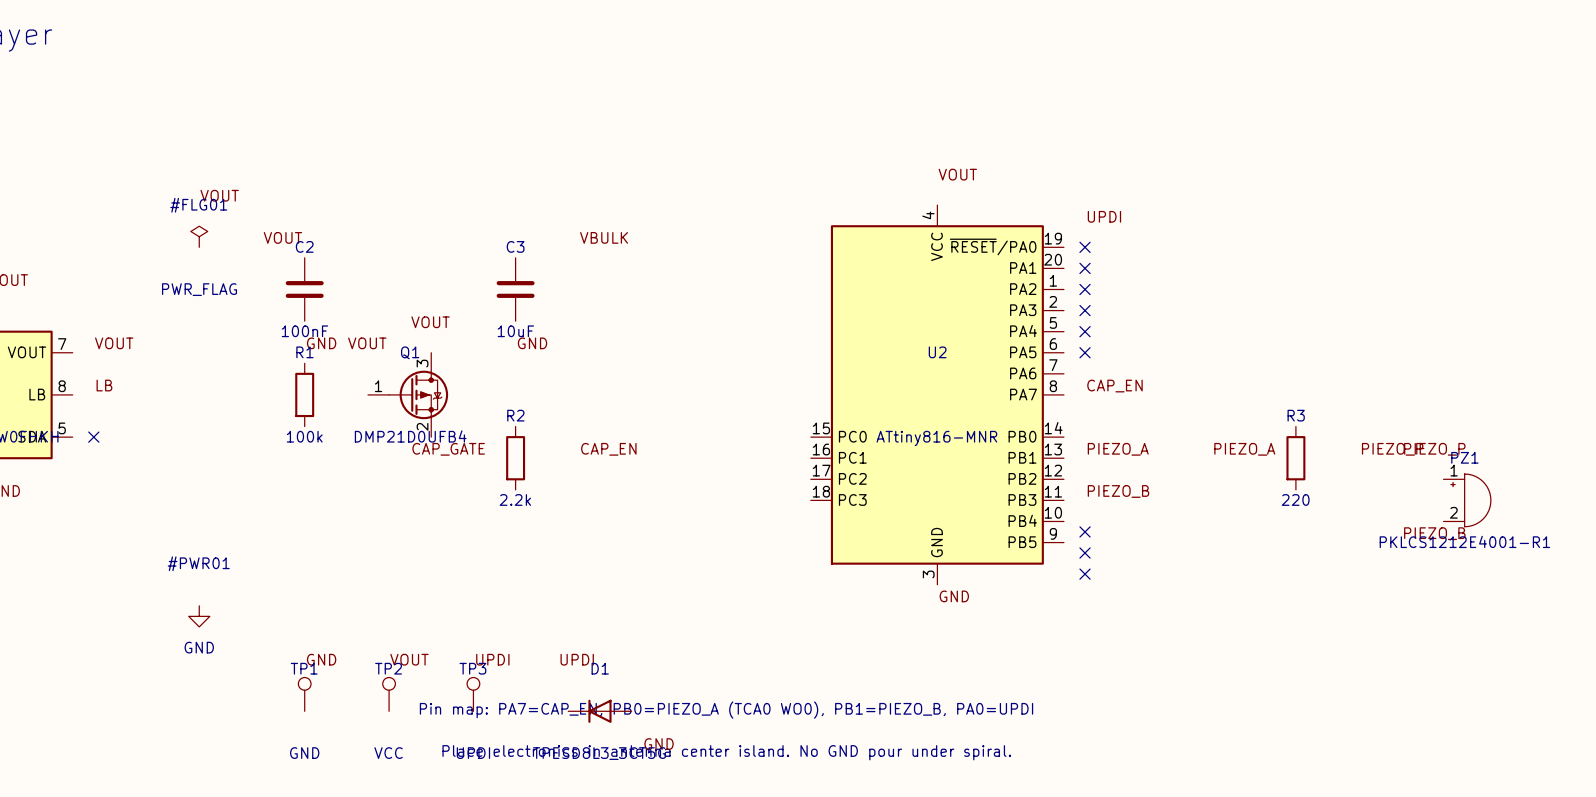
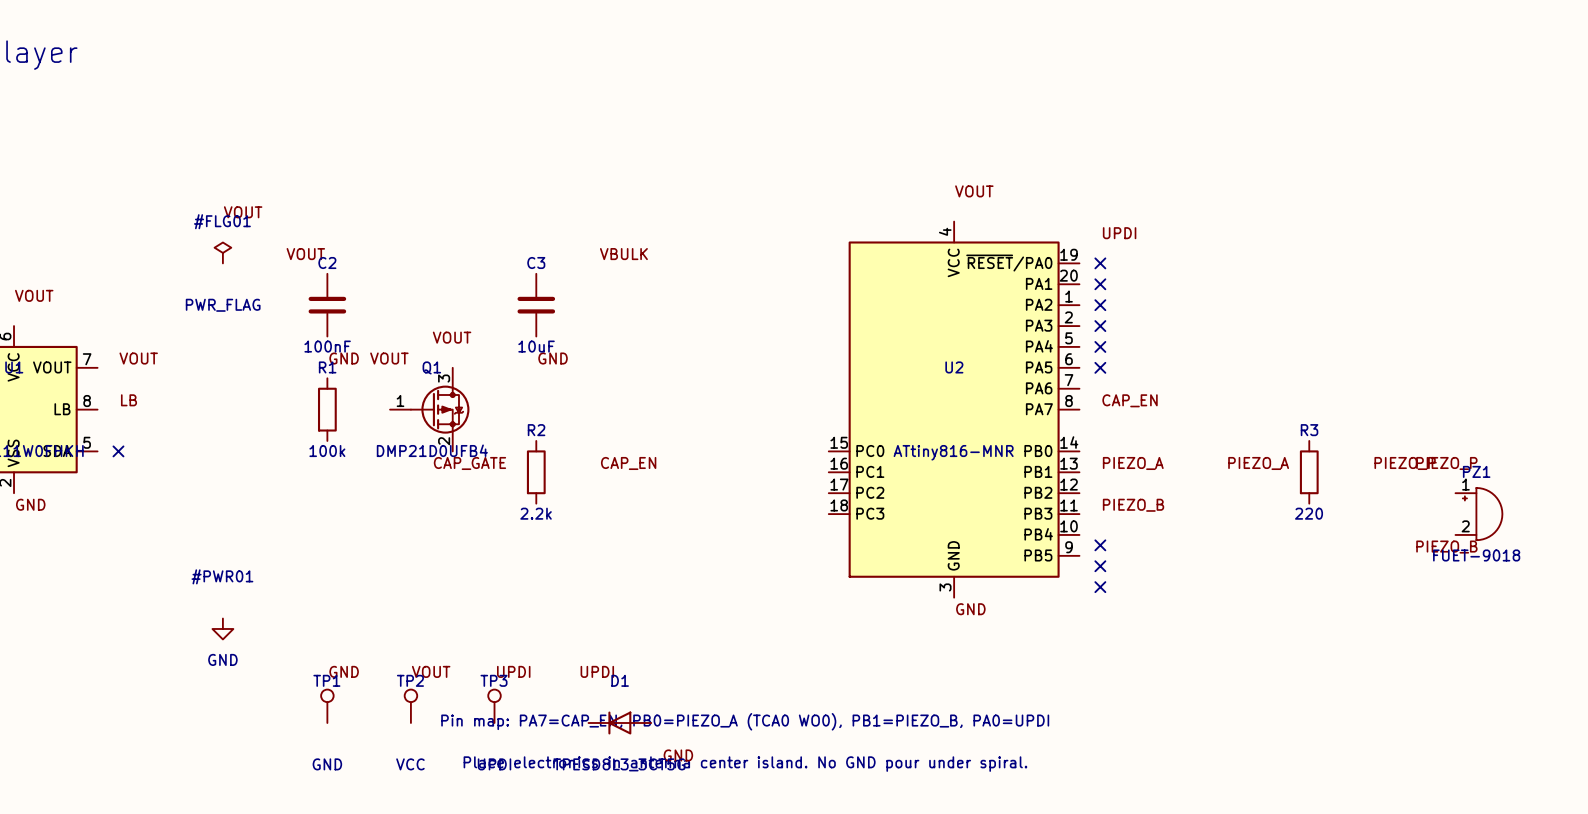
PZ1 value: PKLCS1212E4001-R1 (1464, 541) -> FUET-9018 (1476, 555)

